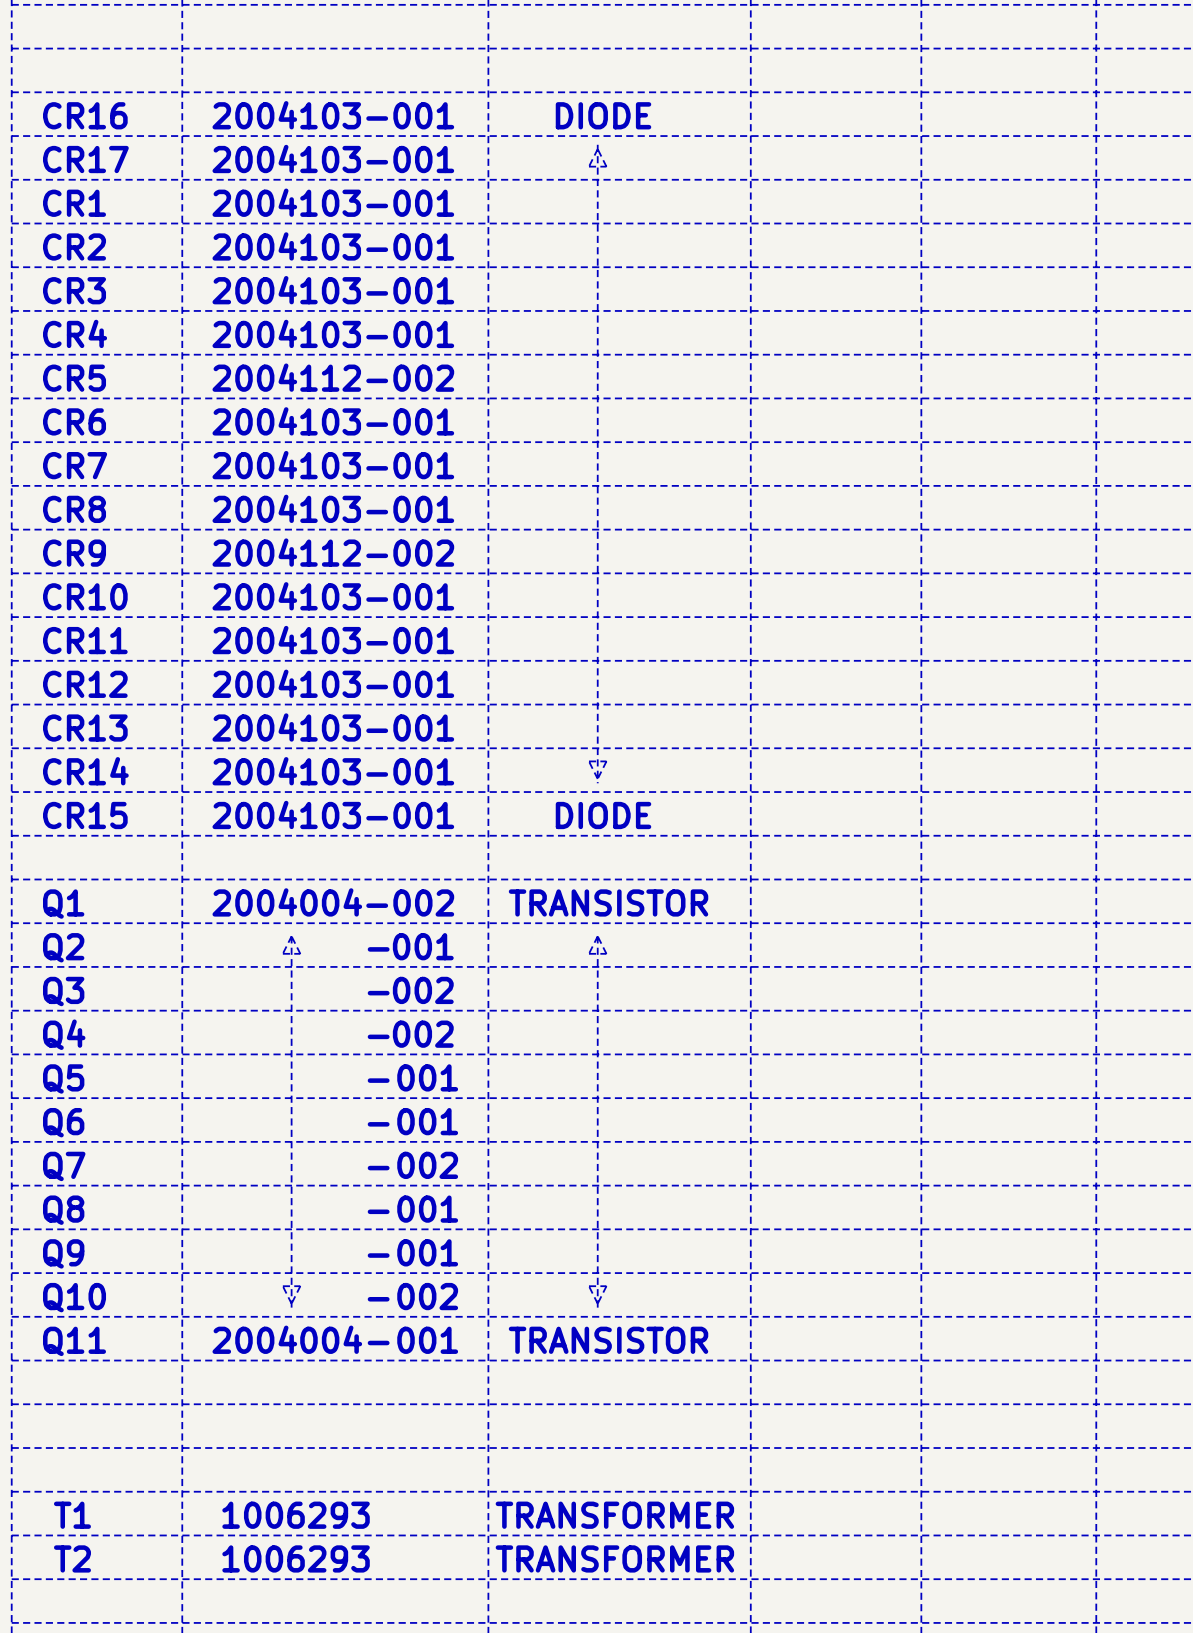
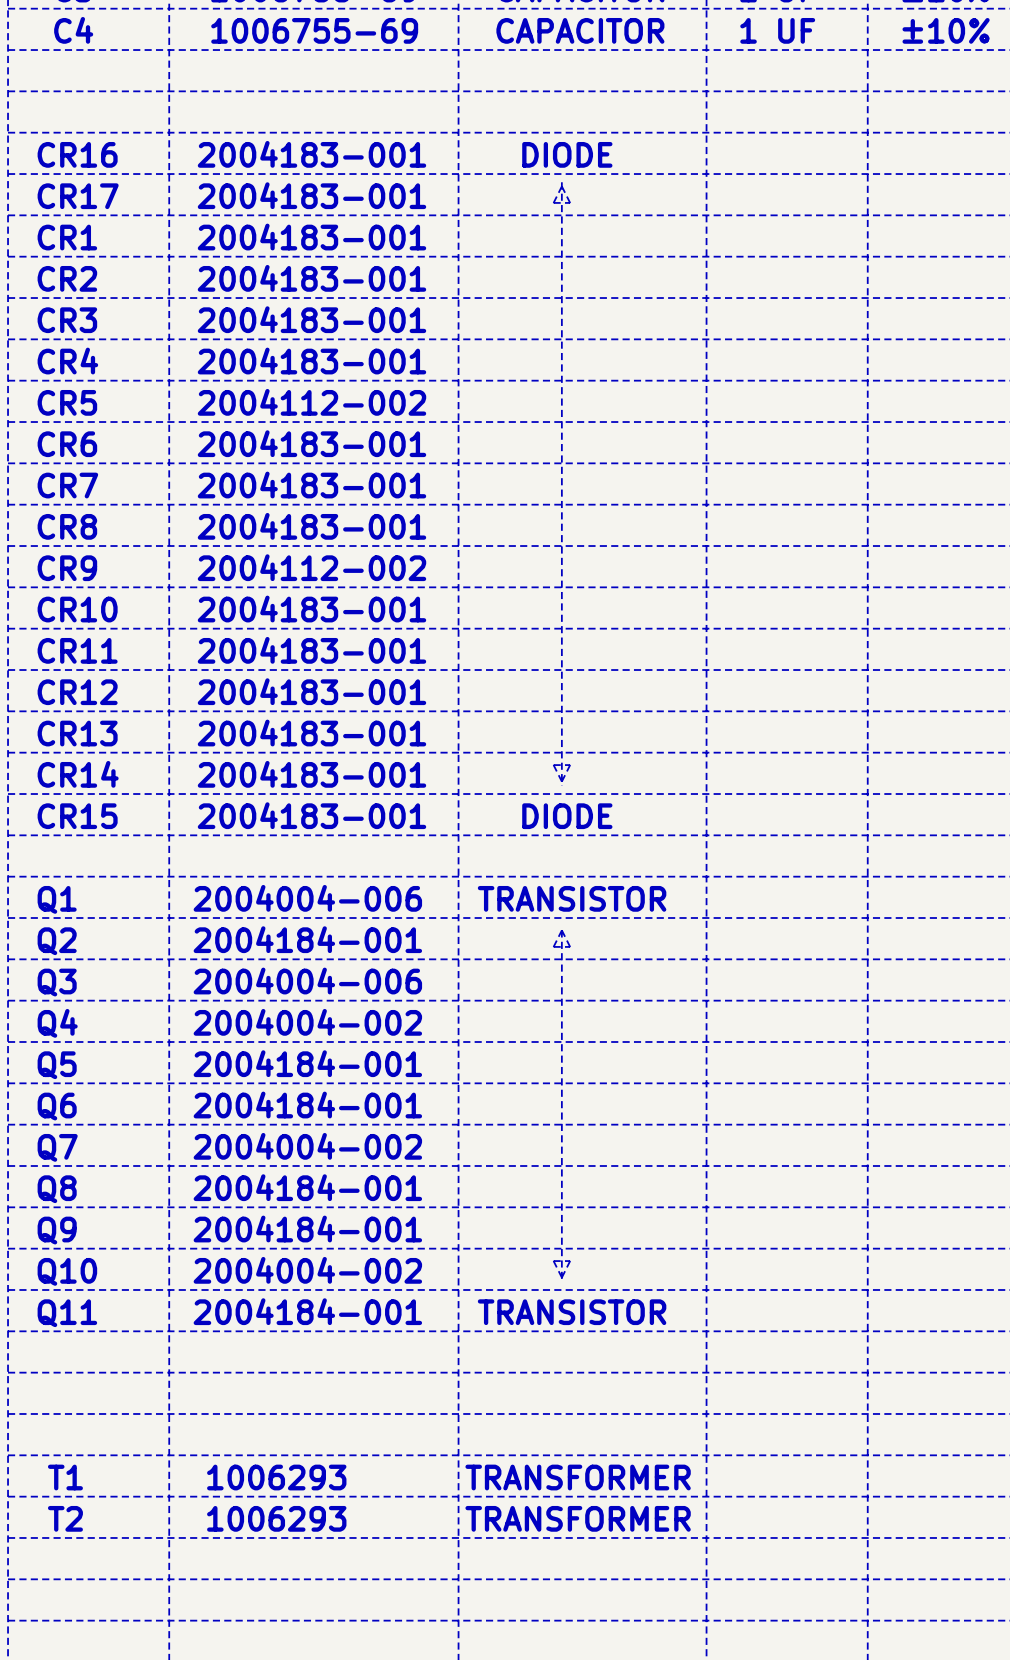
text: 2004103-001 (333, 115) -> 2004183-001 (311, 154)
text: 2004103-001 (333, 158) -> 2004183-001 (311, 195)
text: 2004103-001 (333, 202) -> 2004183-001 (311, 237)
text: 2004103-001 (333, 246) -> 2004183-001 (311, 278)
text: 2004103-001 (333, 290) -> 2004183-001 (311, 319)
text: 2004103-001 (333, 333) -> 2004183-001 (311, 361)
text: 2004103-001 (333, 421) -> 2004183-001 (311, 443)
text: 2004103-001 (333, 465) -> 2004183-001 (311, 485)
text: 2004103-001 (333, 508) -> 2004183-001 (311, 526)
text: 2004103-001 (333, 596) -> 2004183-001 (311, 609)
text: 2004103-001 (333, 640) -> 2004183-001 (311, 650)
text: 2004103-001 (333, 683) -> 2004183-001 (311, 691)
text: 2004103-001 (333, 727) -> 2004183-001 (311, 733)
text: 2004103-001 (333, 771) -> 2004183-001 (311, 774)
text: 2004103-001 (333, 814) -> 2004183-001 (311, 815)
text: 2004004-002 (333, 902) -> 2004004-006 (307, 898)
line: (291, 936) (291, 1308) -> none
line: (291, 936) (282, 953) (300, 953) (291, 936) -> none
text: none -> 2004184-001 (307, 939)
text: 001 (423, 946) -> none
text: - (378, 949) -> none
text: none -> 2004004-006 (307, 981)
text: 002 (423, 990) -> none
text: - (378, 993) -> none
text: none -> 2004004-002 (307, 1022)
text: 002 (423, 1034) -> none
text: - (378, 1036) -> none
text: none -> 2004184-001 (307, 1063)
text: 001 (427, 1077) -> none
text: - (378, 1080) -> none
text: none -> 2004184-001 (307, 1105)
text: 001 (427, 1121) -> none
text: - (378, 1124) -> none
text: none -> 2004004-002 (307, 1146)
text: 002 (427, 1165) -> none
text: - (378, 1168) -> none
text: none -> 2004184-001 (307, 1187)
text: 001 (427, 1209) -> none
text: - (378, 1211) -> none
text: none -> 2004184-001 (307, 1229)
text: 001 (427, 1252) -> none
text: - (378, 1255) -> none
line: (282, 1286) (291, 1303) (300, 1286) (282, 1286) -> none
text: none -> 2004004-002 (307, 1270)
text: 002 (427, 1296) -> none
text: - (378, 1299) -> none
text: 2004004 (287, 1339) -> 2004184-001 (307, 1311)
text: 001 (427, 1340) -> none
text: - (378, 1342) -> none

